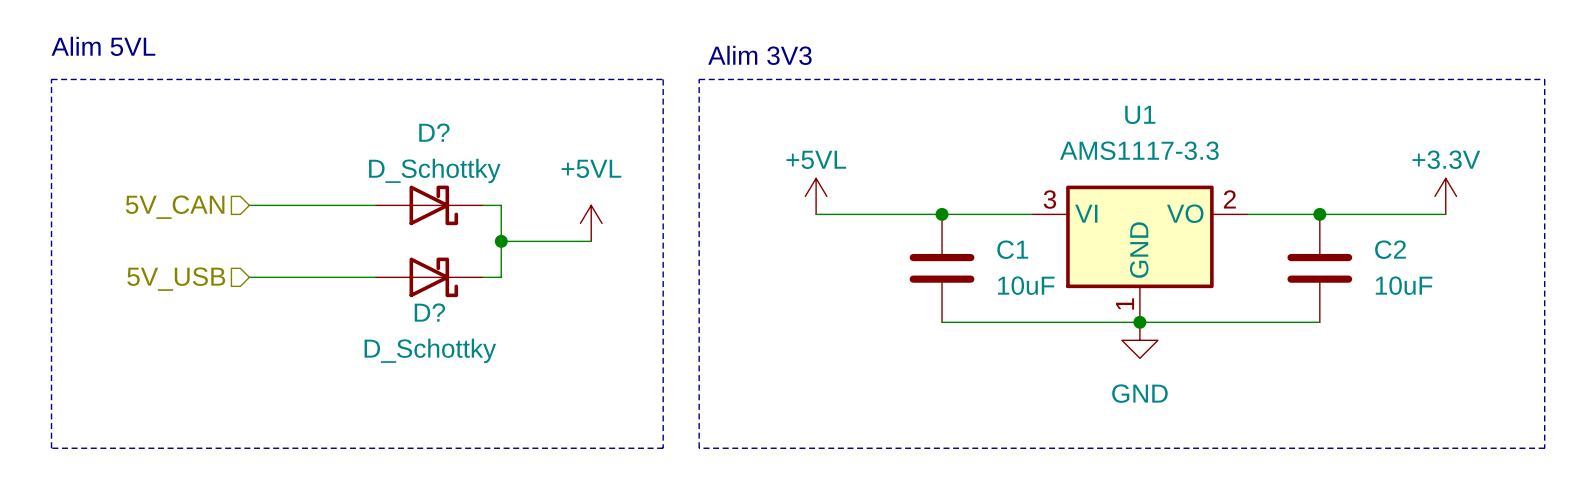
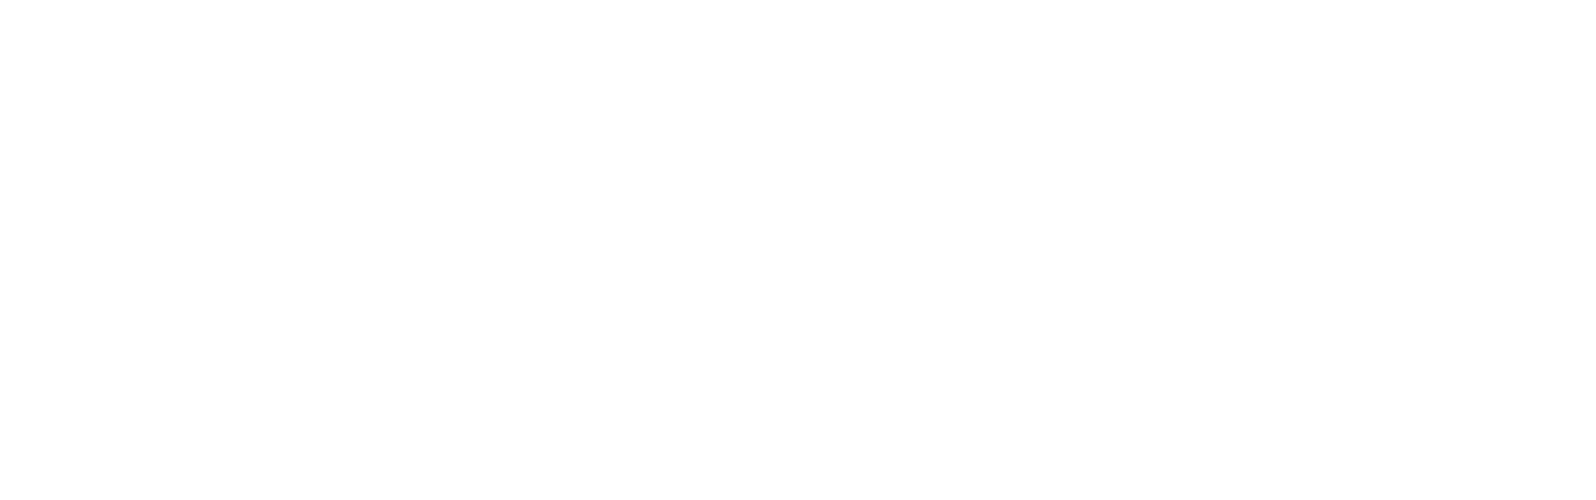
text: Alim 5VL (103, 46) -> none
text: Alim 3V3 (759, 55) -> none
line: (51, 79) (663, 79) (663, 448) (51, 448) (51, 79) -> none
line: (699, 79) (1544, 79) (1544, 448) (699, 448) (699, 79) -> none
power symbol: +5VL (816, 196) -> none
power symbol: +3.3V (1445, 196) -> none
wire: (249, 205) (375, 205) -> none
D?: D_Schottky (429, 205) -> none
wire: (483, 205) (501, 205) (501, 277) (483, 277) -> none
hierarchical label: 5V_CAN (175, 207) -> none
wire: (816, 214) (1031, 214) -> none
junction: (942, 214) -> none
wire: (1247, 214) (1445, 214) -> none
junction: (1319, 214) -> none
power symbol: +5VL (591, 223) -> none
wire: (501, 241) (591, 241) -> none
junction: (501, 241) -> none
U1: AMS1117-3.3 (1139, 253) -> none
C1: 10uF (942, 268) -> none
C2: 10uF (1319, 268) -> none
wire: (249, 277) (375, 277) -> none
D?: D_Schottky (429, 277) -> none
hierarchical label: 5V_USB (176, 279) -> none
wire: (942, 322) (1319, 322) -> none
junction: (1139, 322) -> none
power symbol: GND (1139, 340) -> none

